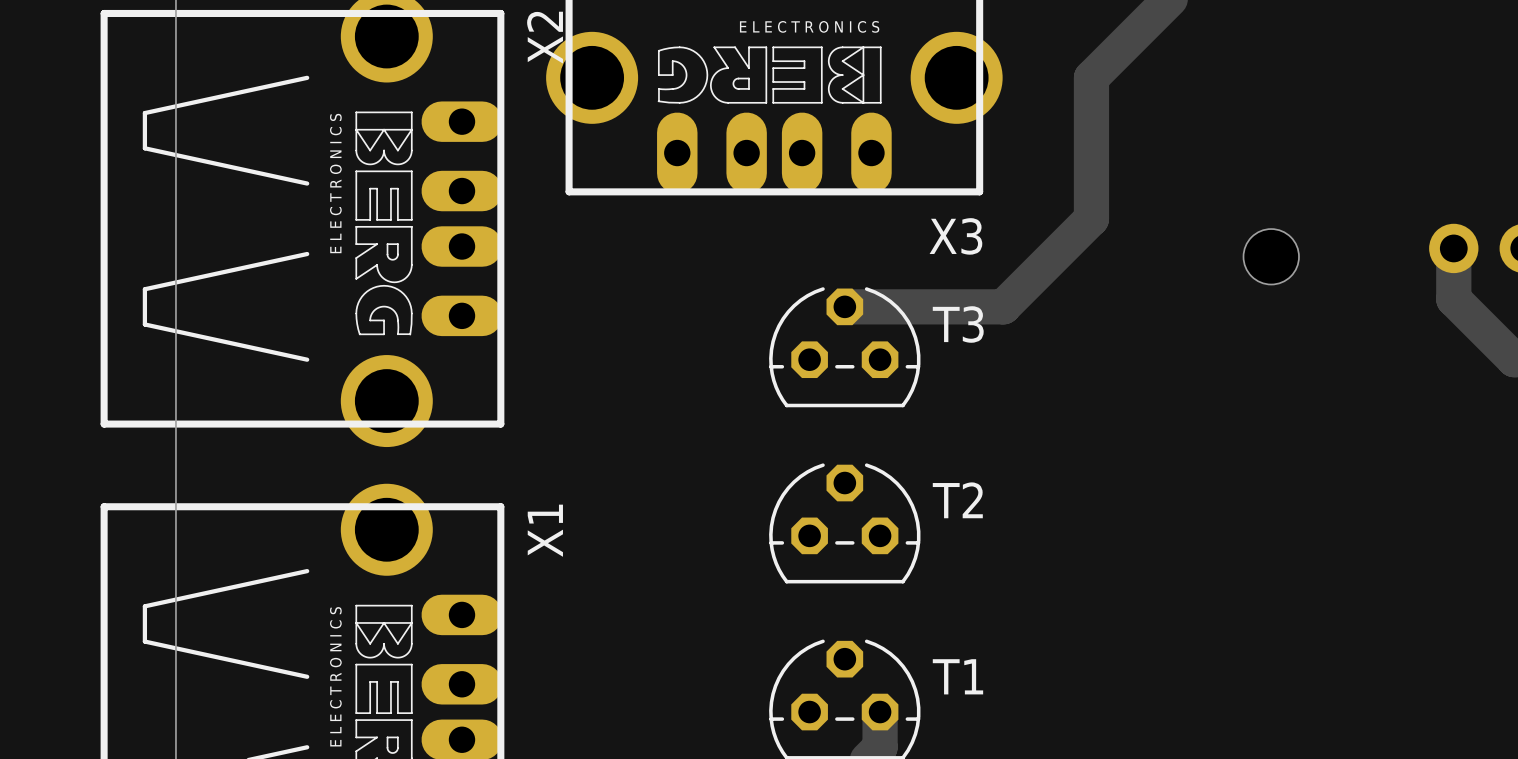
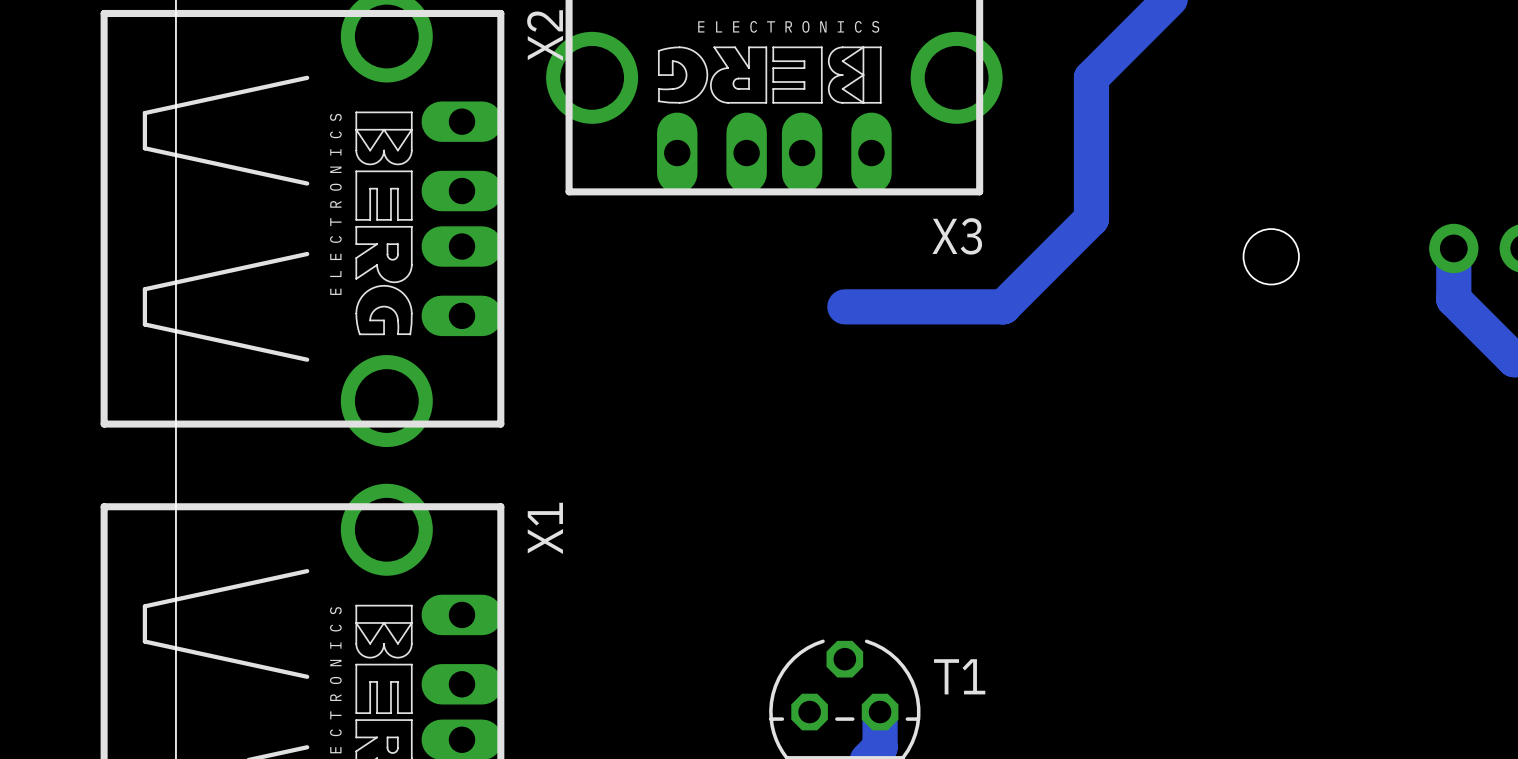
T3: (844, 347) -> none
T2: (844, 523) -> none

